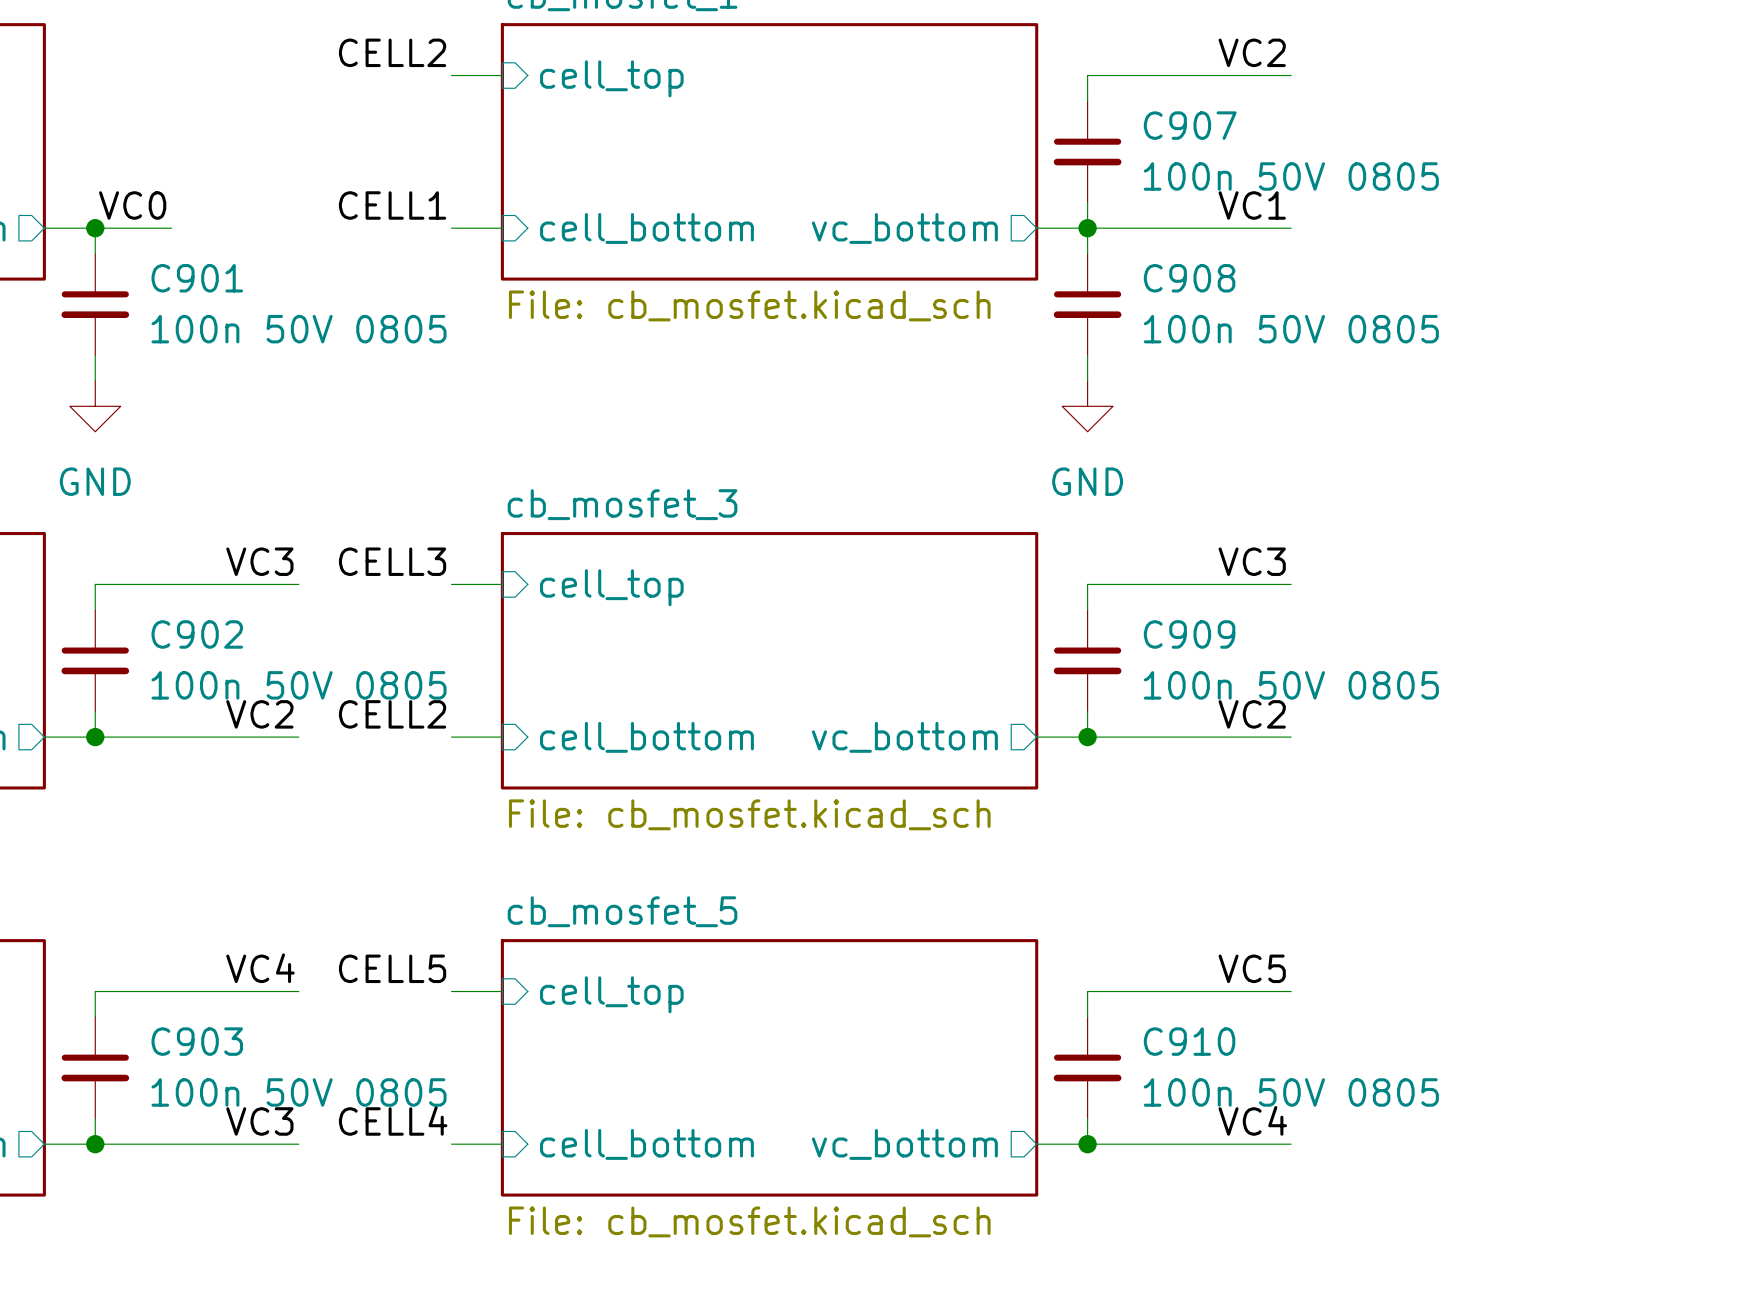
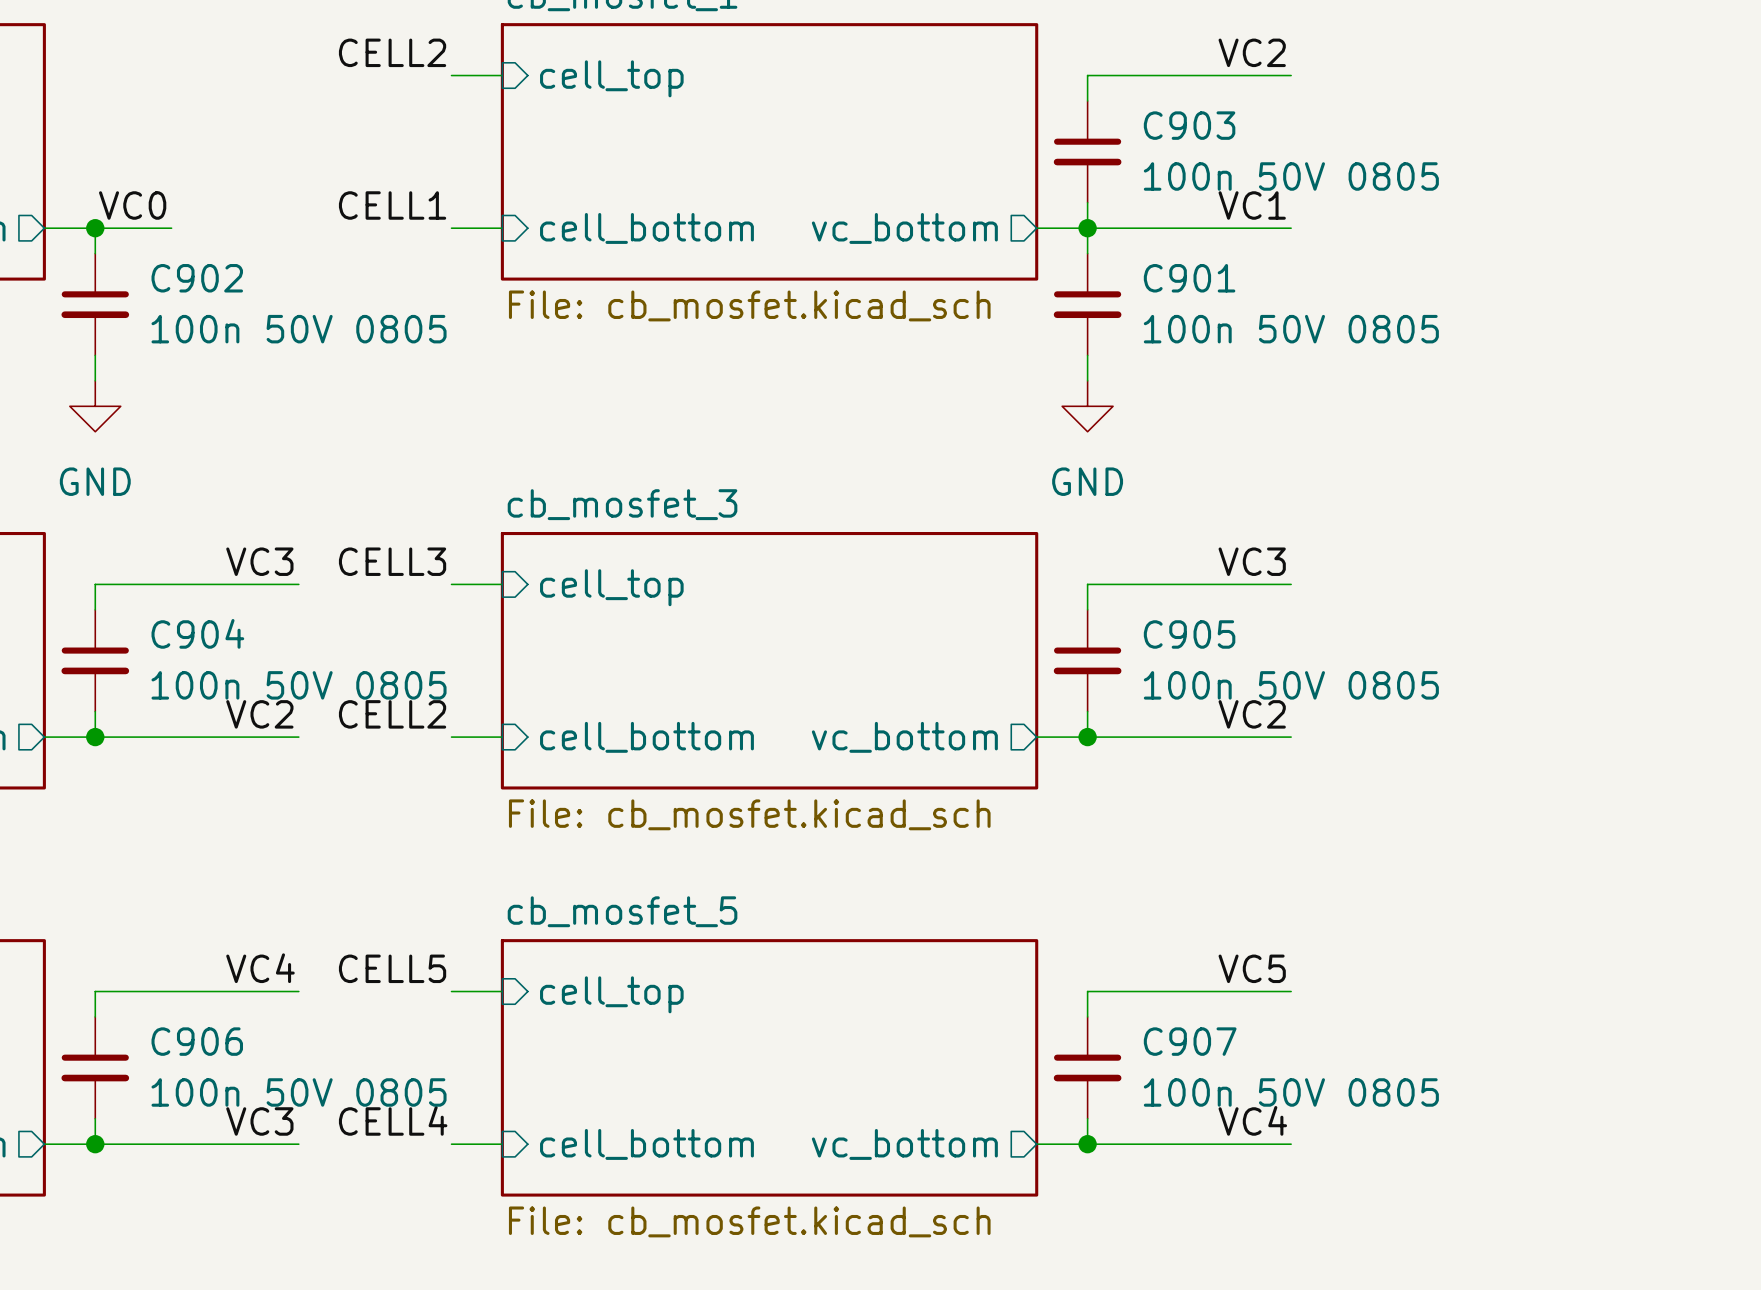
C907 name: C907 (1190, 125) -> C903 (1189, 125)
C901 name: C901 (197, 278) -> C902 (197, 278)
C908 name: C908 (1189, 278) -> C901 (1189, 278)
C902 name: C902 (197, 634) -> C904 (197, 633)
C909 name: C909 (1189, 634) -> C905 (1189, 634)
C903 name: C903 (197, 1041) -> C906 (197, 1041)
C910 name: C910 (1189, 1041) -> C907 (1190, 1041)

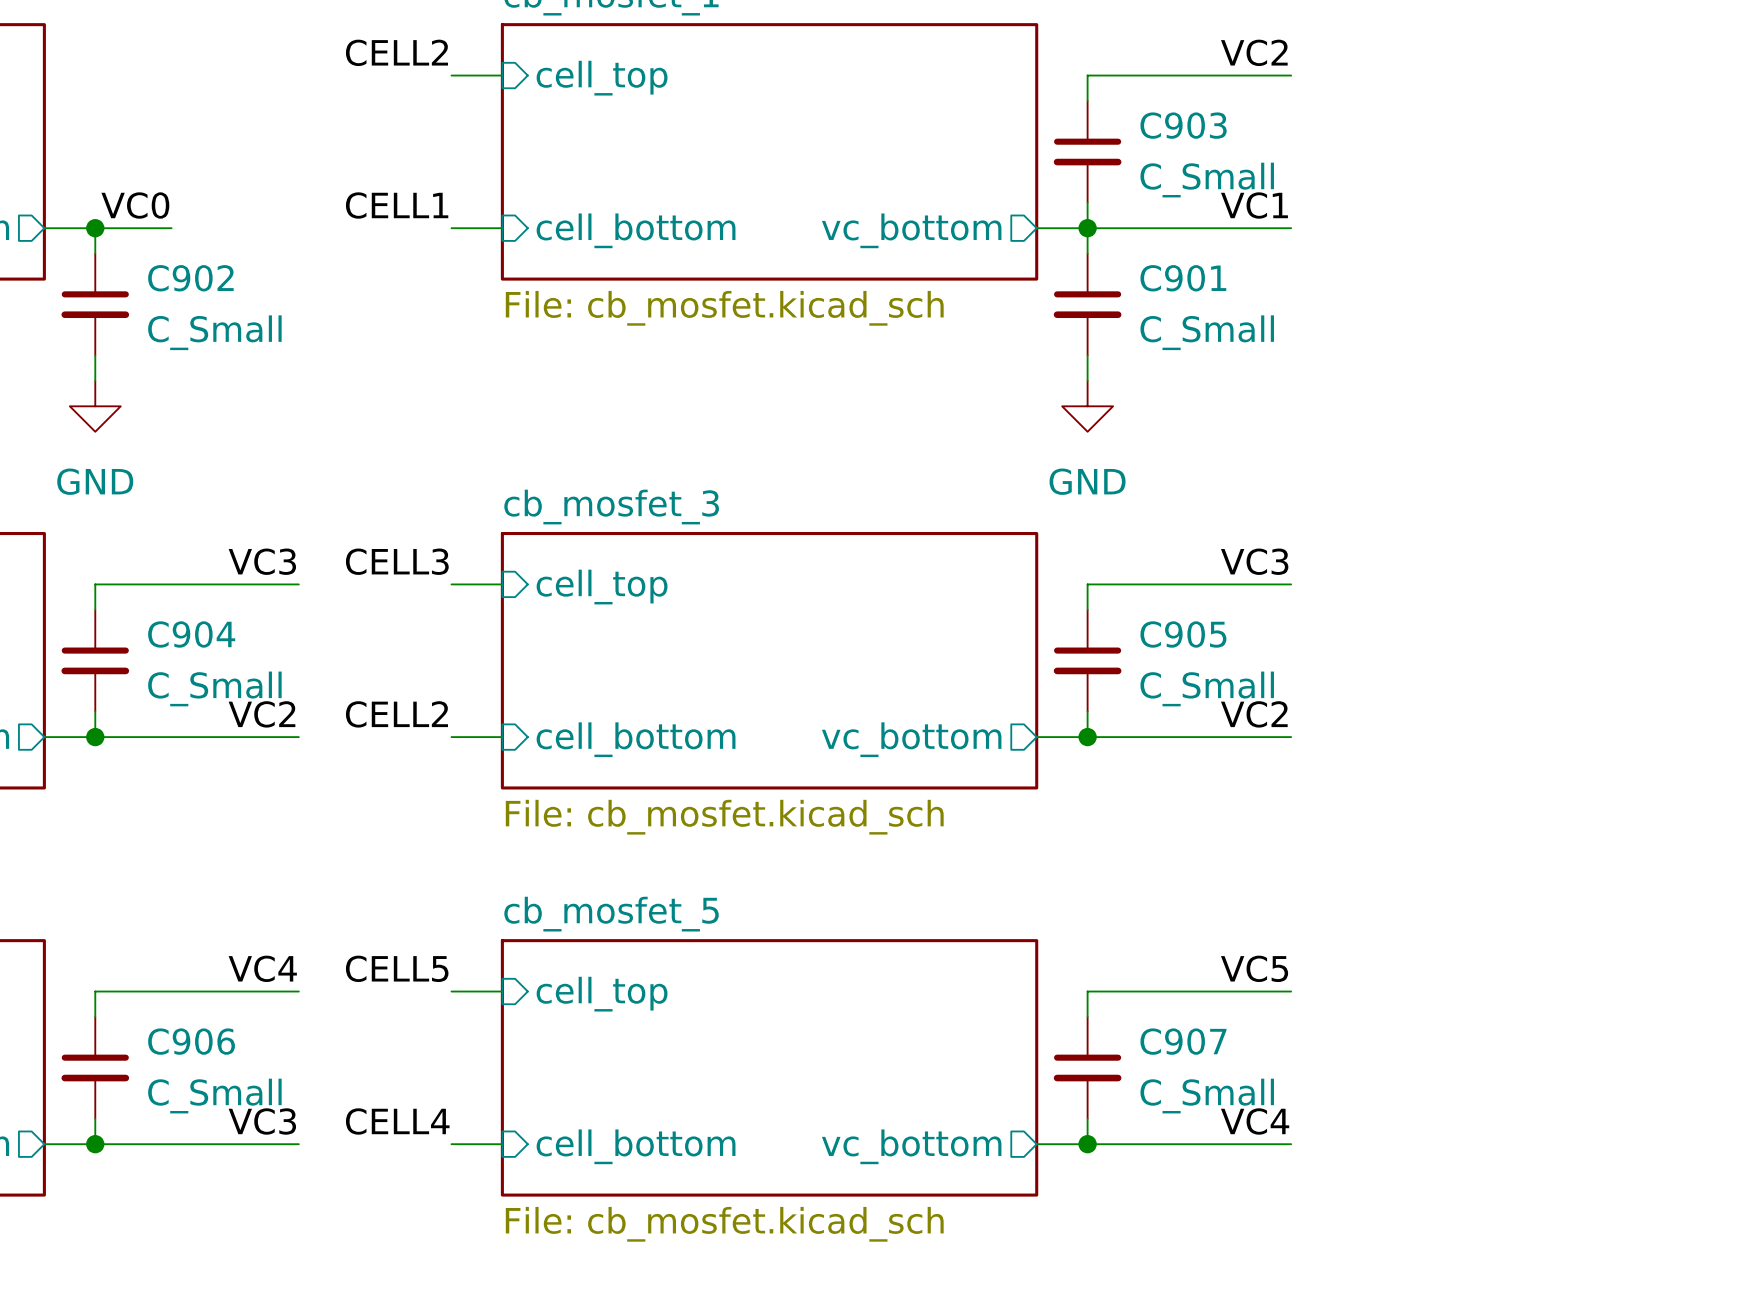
C903 value: 100n 50V 0805 (1291, 176) -> C_Small (1207, 180)
C902 value: 100n 50V 0805 (299, 329) -> C_Small (214, 332)
C901 value: 100n 50V 0805 (1291, 329) -> C_Small (1207, 332)
C904 value: 100n 50V 0805 (299, 685) -> C_Small (214, 688)
C905 value: 100n 50V 0805 (1291, 685) -> C_Small (1207, 688)
C906 value: 100n 50V 0805 (299, 1092) -> C_Small (214, 1096)
C907 value: 100n 50V 0805 (1291, 1092) -> C_Small (1207, 1096)

